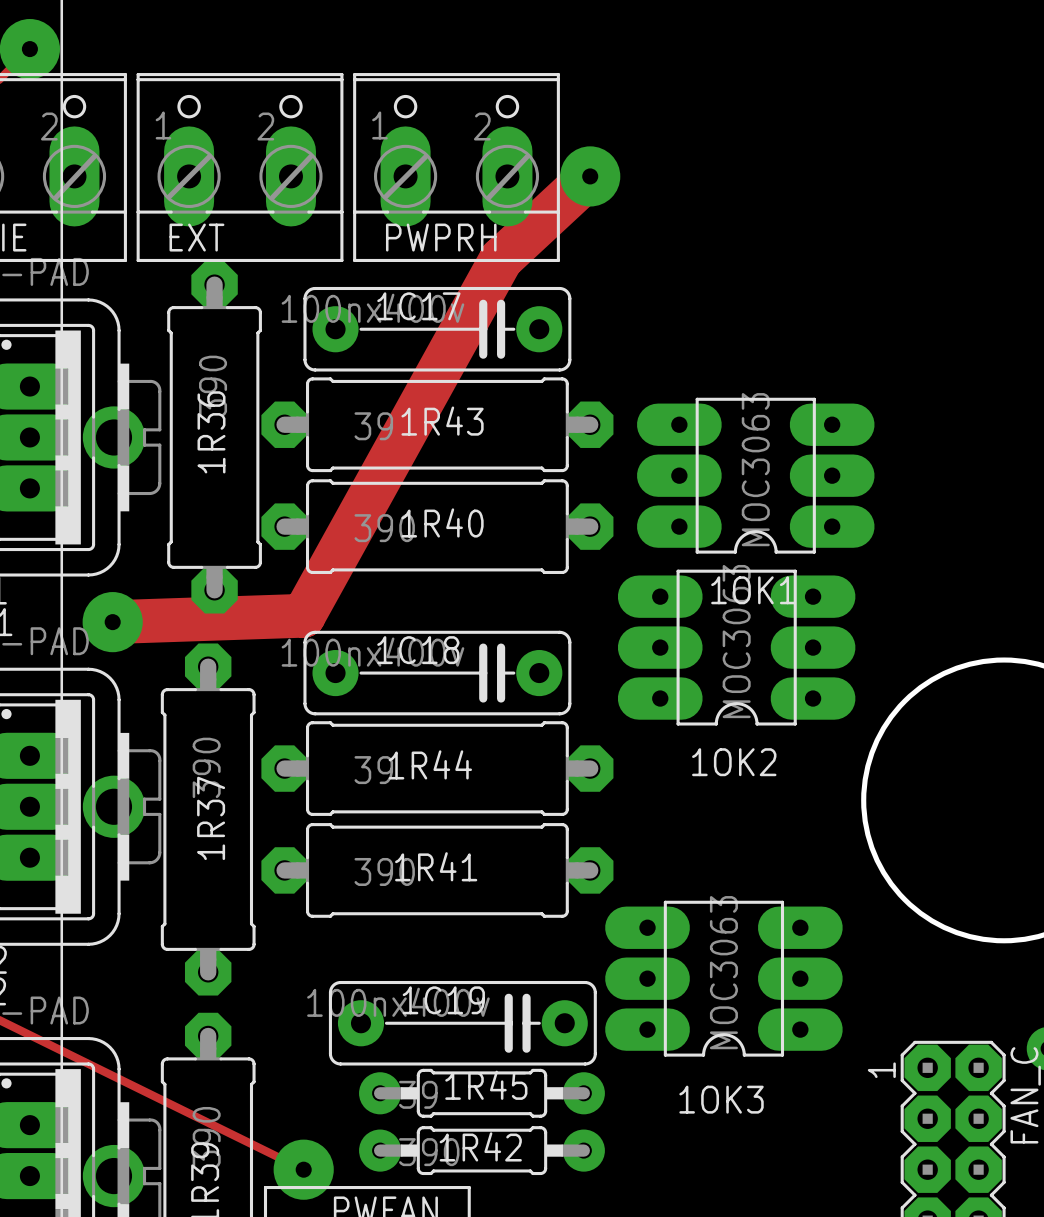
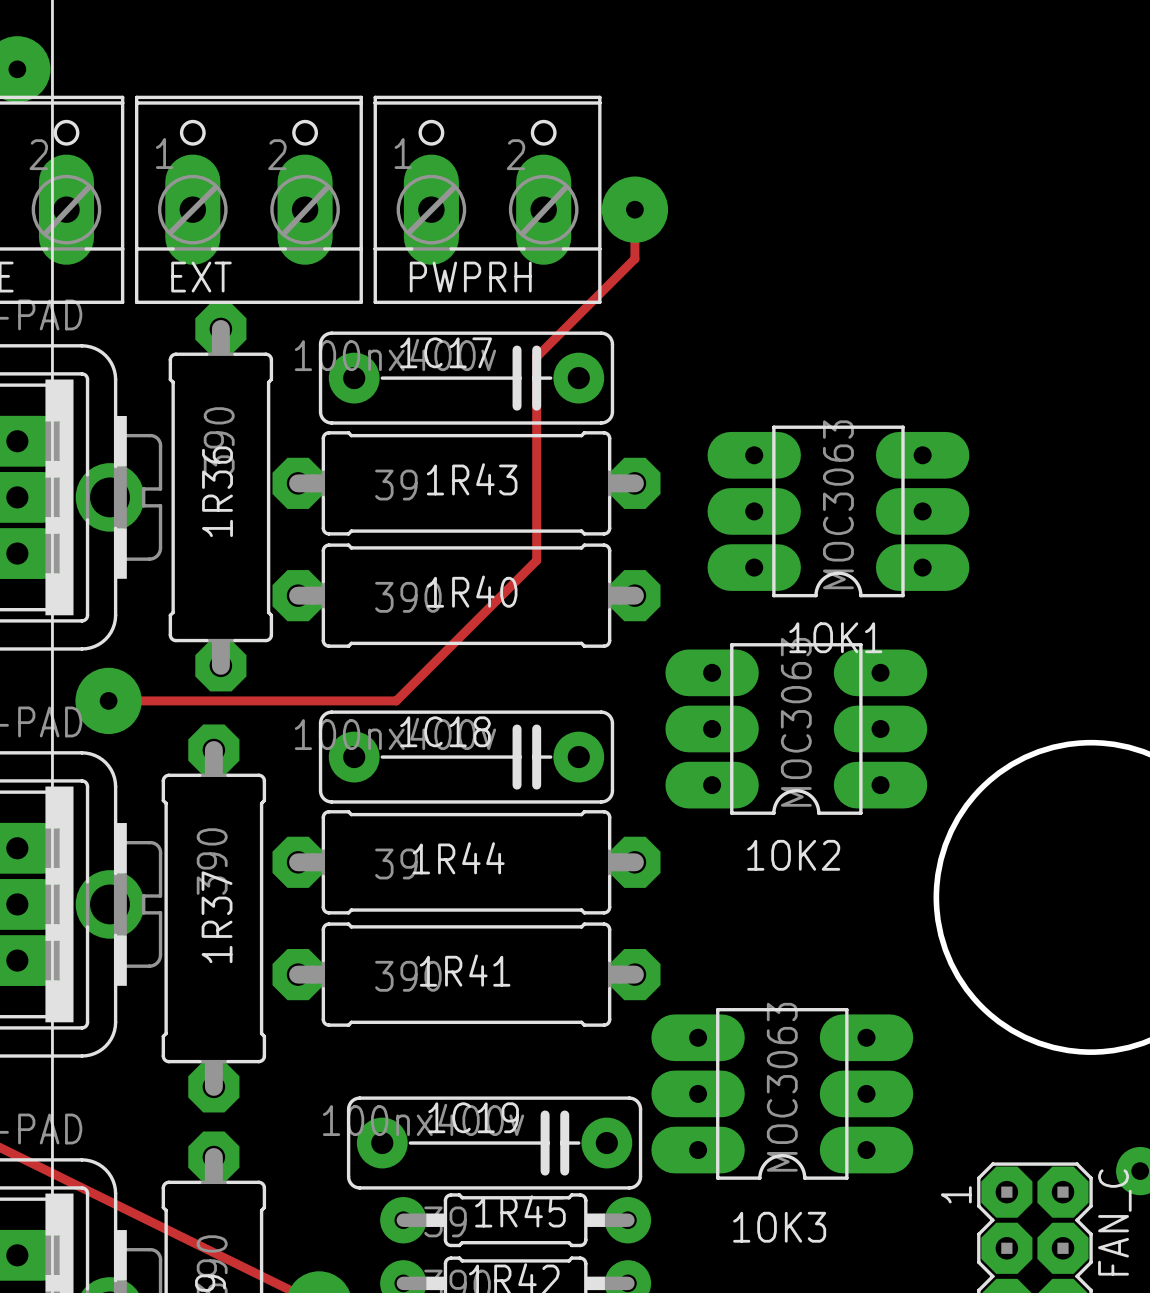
track: (590, 176) (501, 259) (303, 615) (112, 622) -> (634, 209) (634, 258) (536, 357) (536, 560) (396, 700) (108, 700)
1OK1 position: (755, 475) -> (838, 511)

